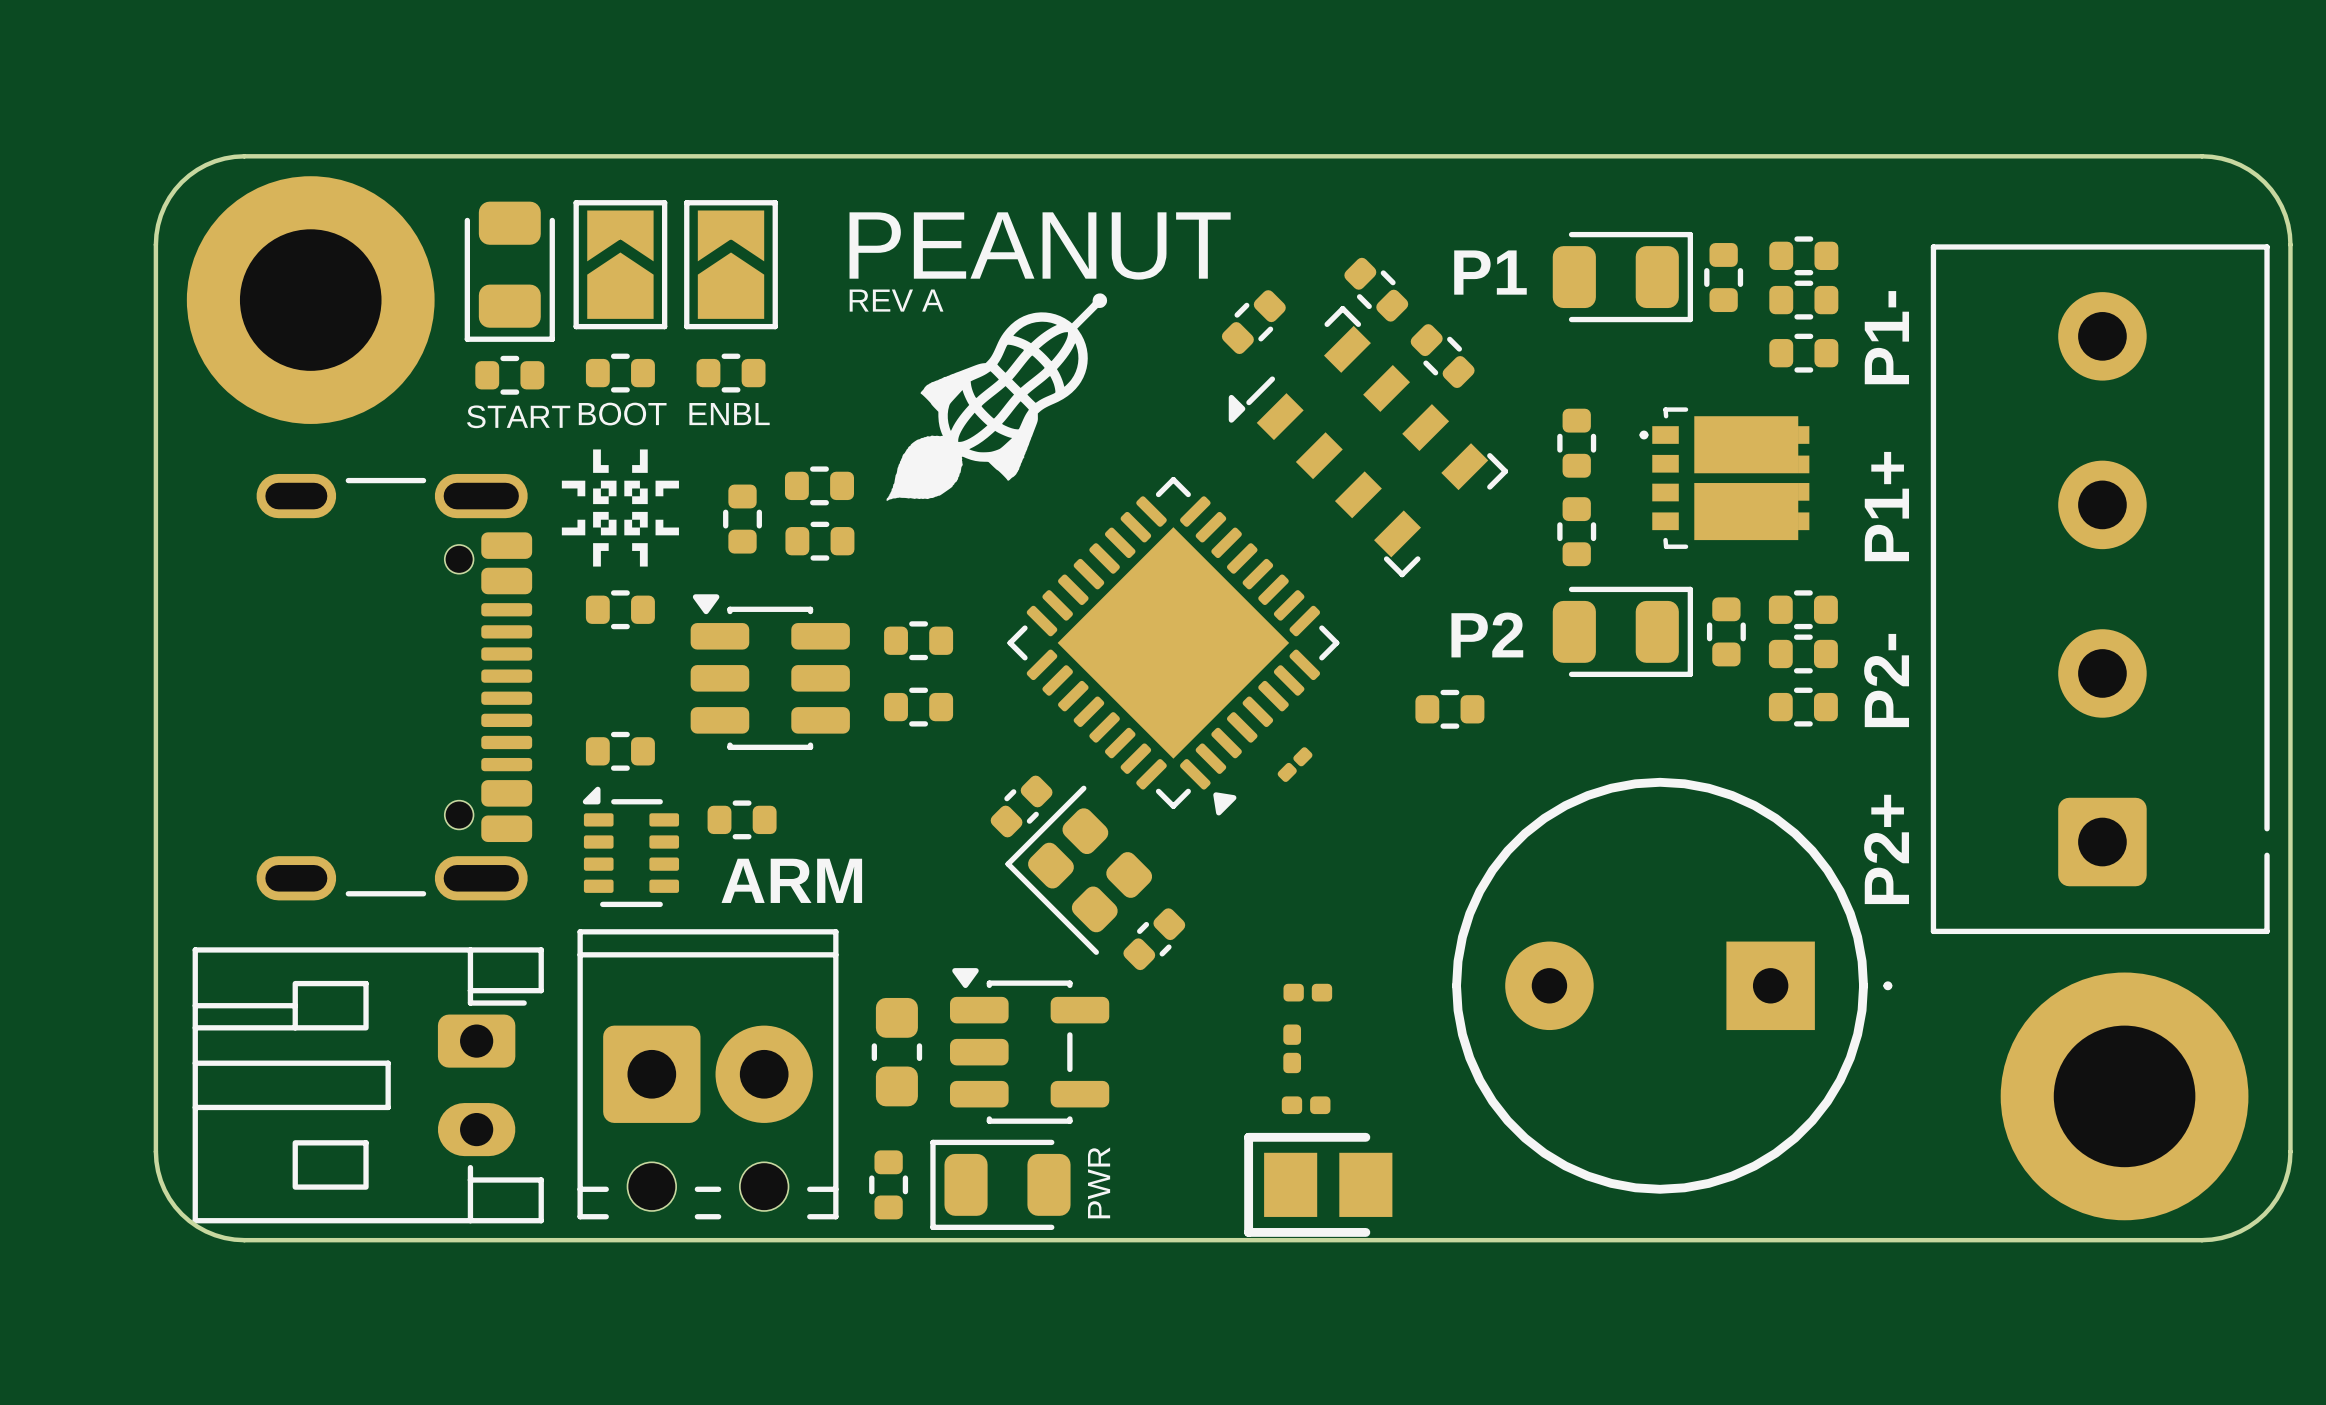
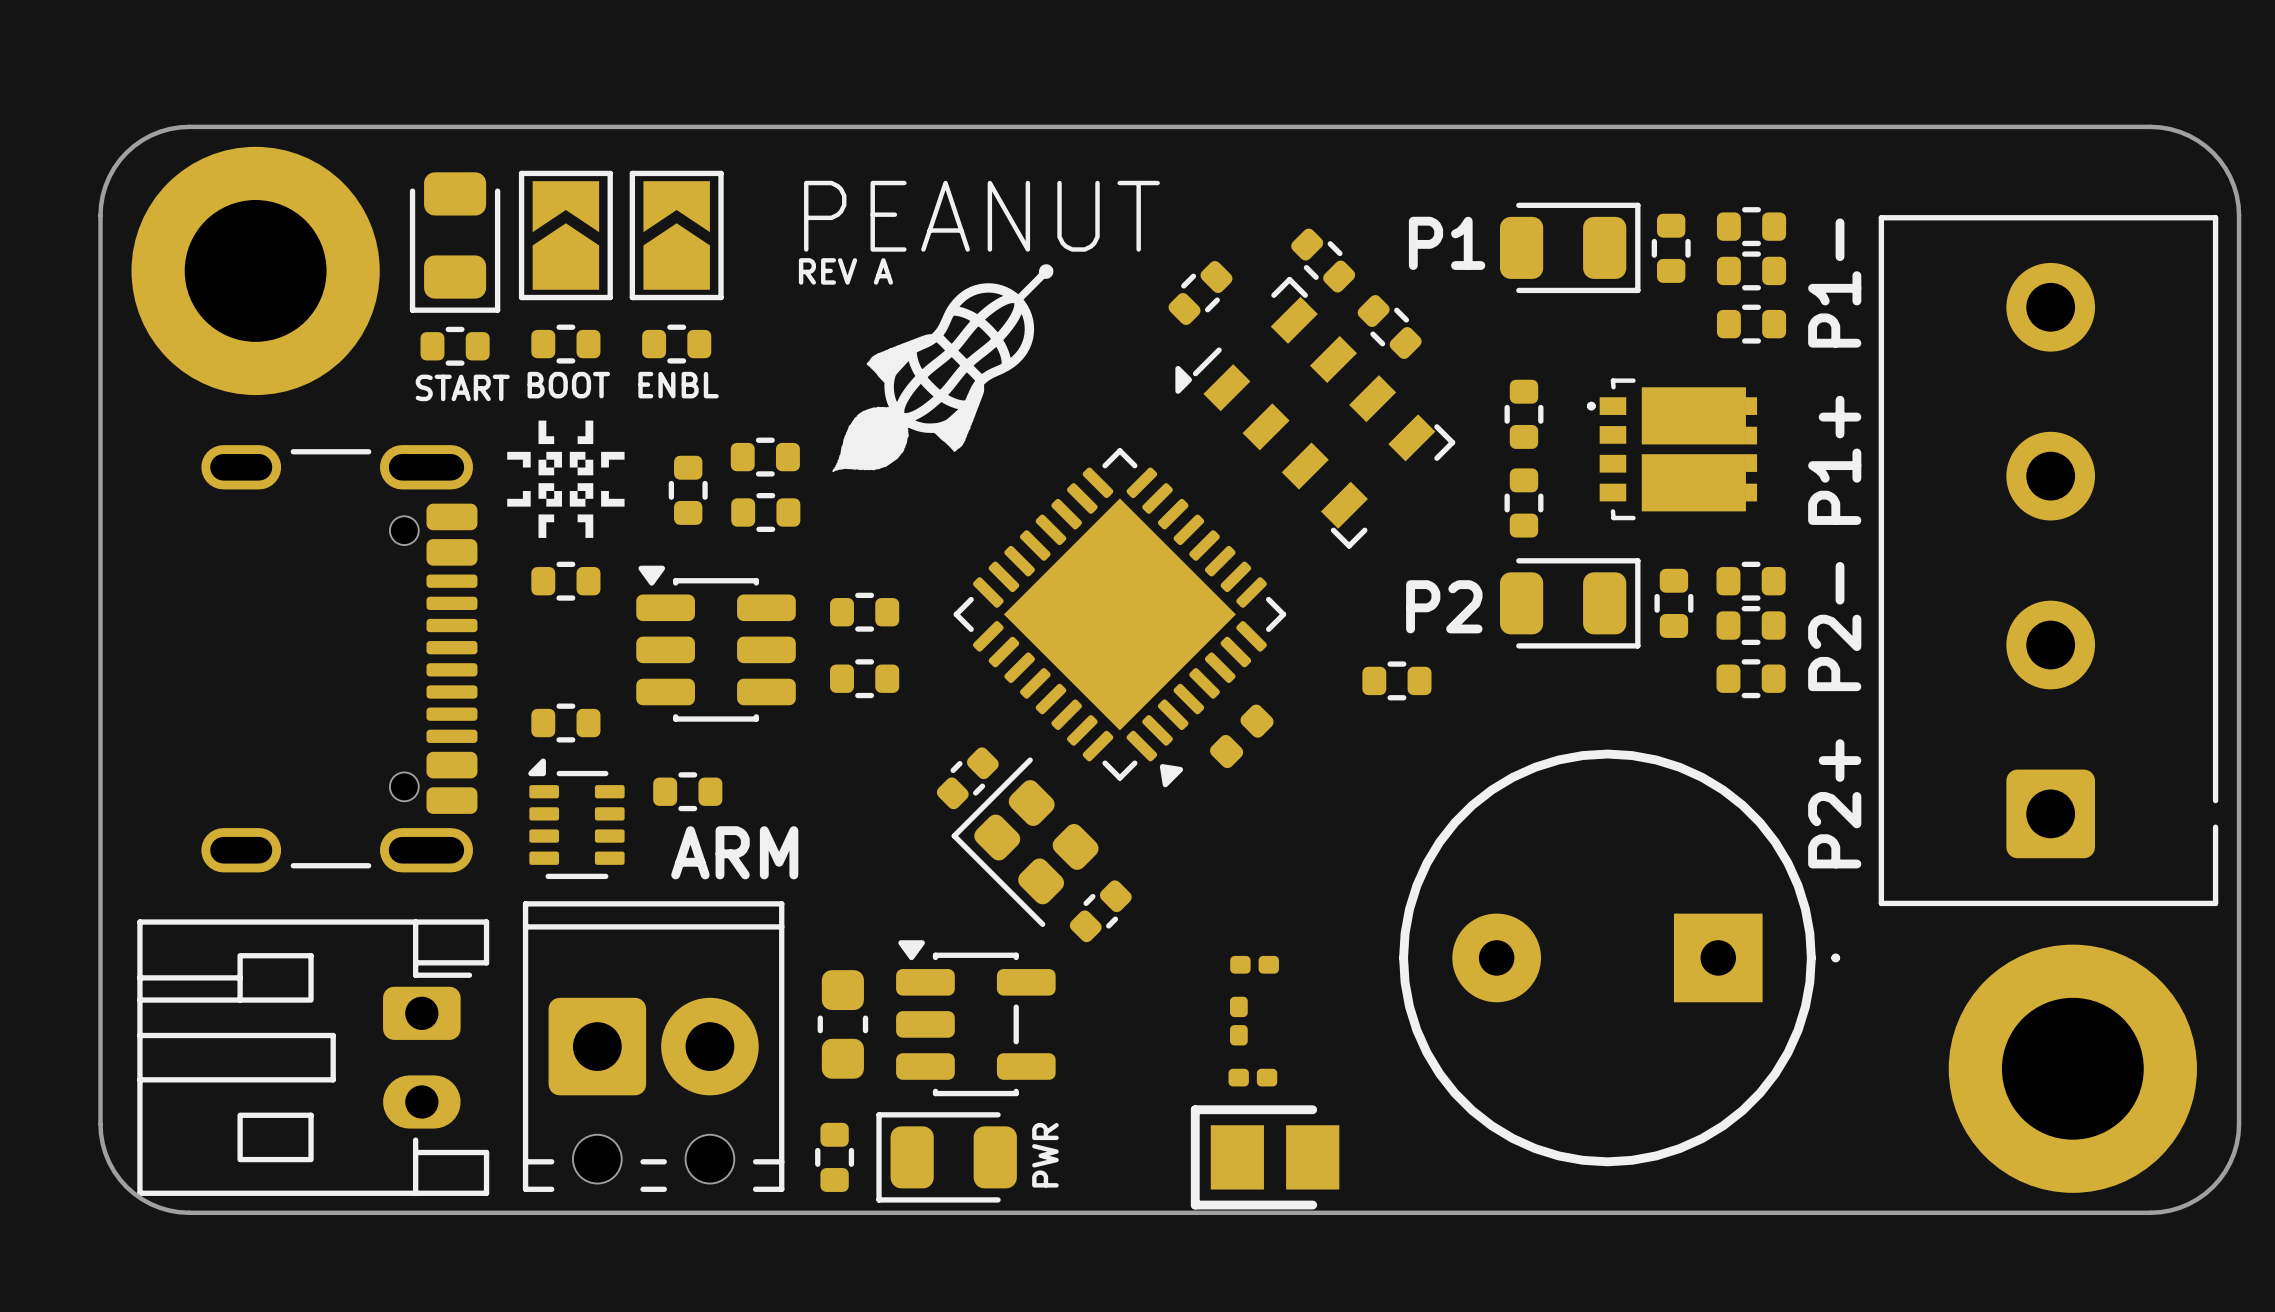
part footprint: [1277, 747, 1313, 782] -> [1210, 704, 1274, 769]

